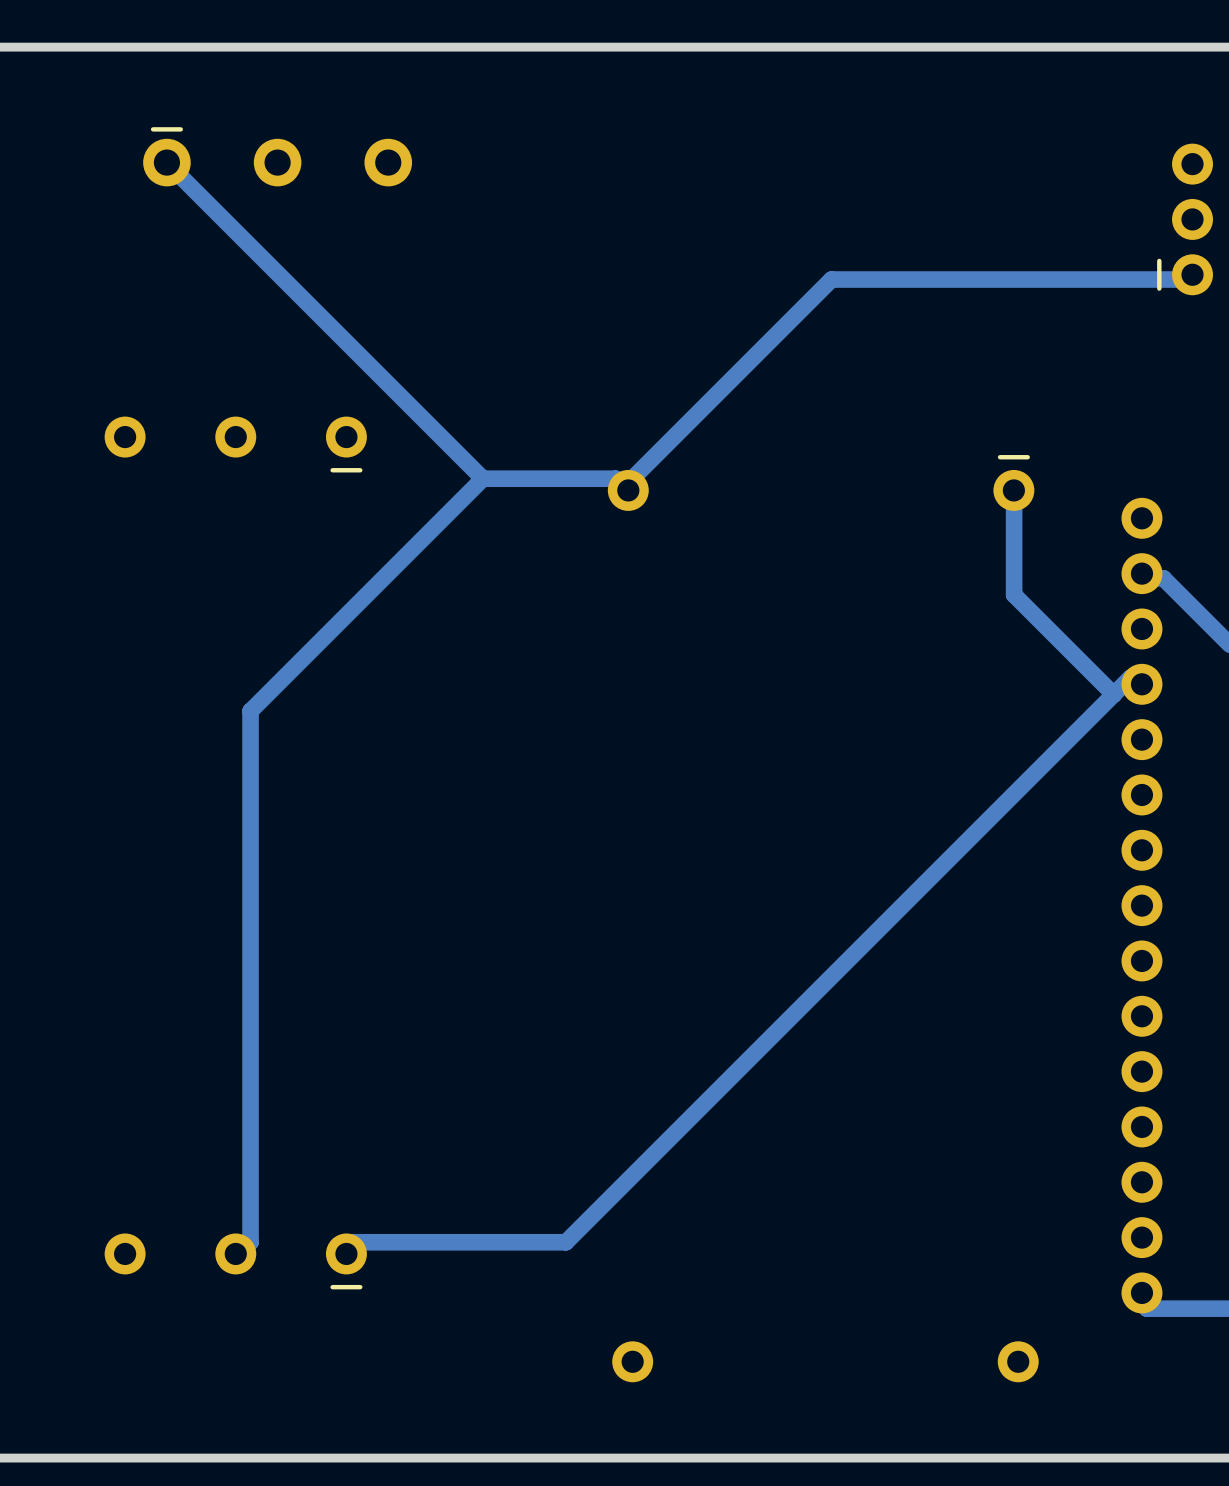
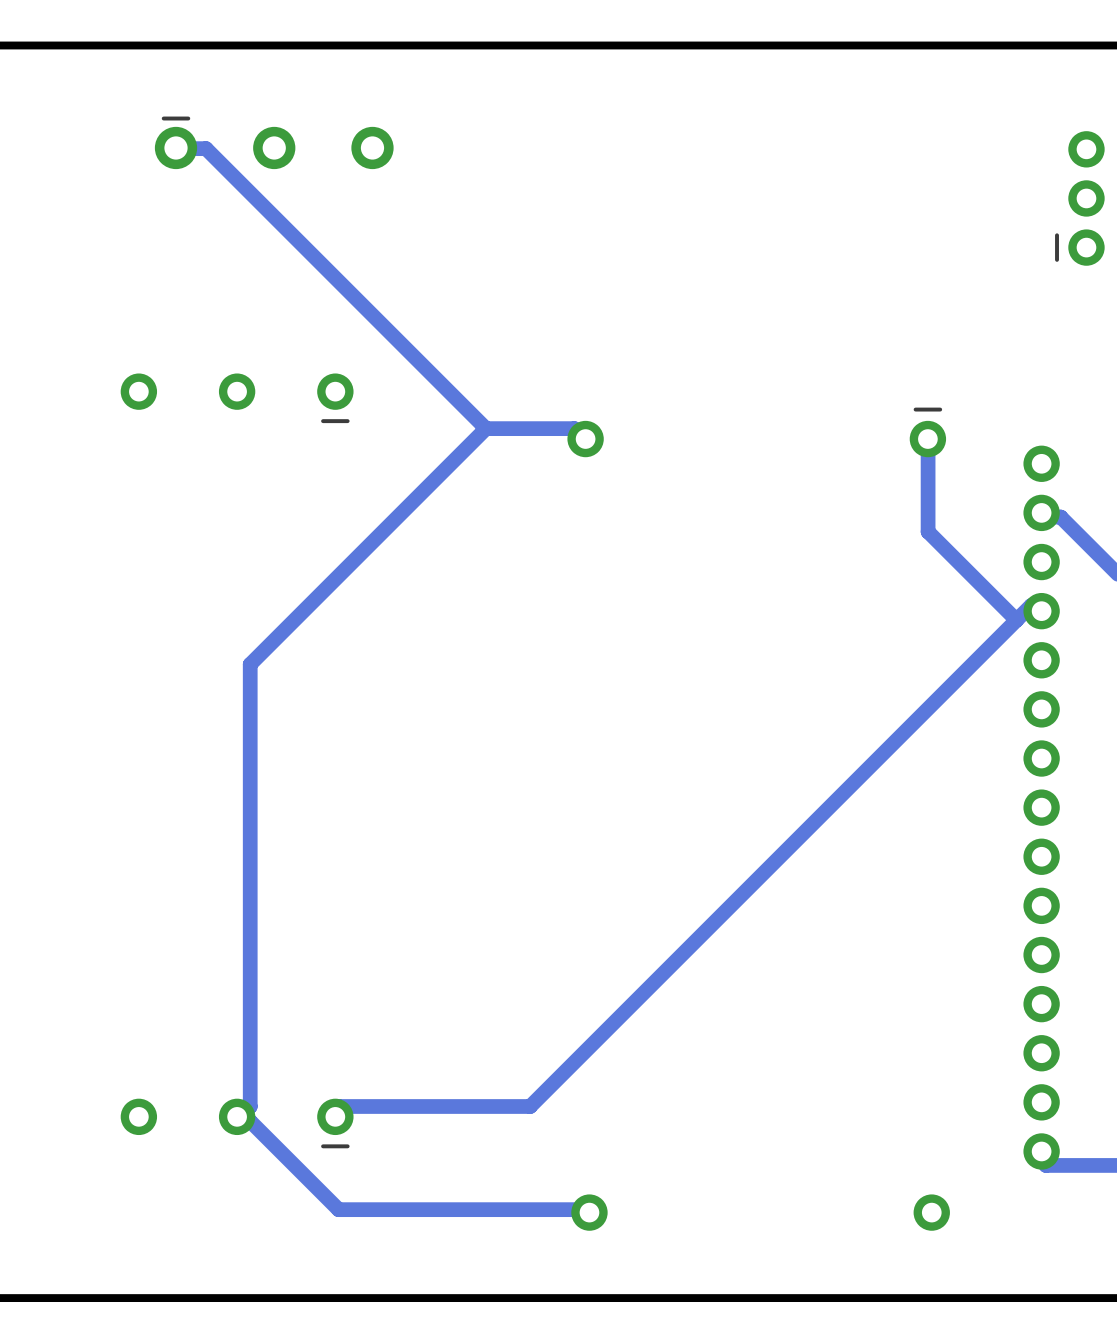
track: (167, 163) (482, 478) -> (176, 148) (206, 148) (486, 428) (250, 664)
track: (1192, 274) (1180, 279) (831, 279) (632, 478) (628, 490) -> none
track: (482, 478) (250, 711) (250, 744) -> none
track: (516, 478) (482, 478) -> none
track: none -> (237, 1116) (250, 1121) (338, 1209) (589, 1209) (589, 1212)

